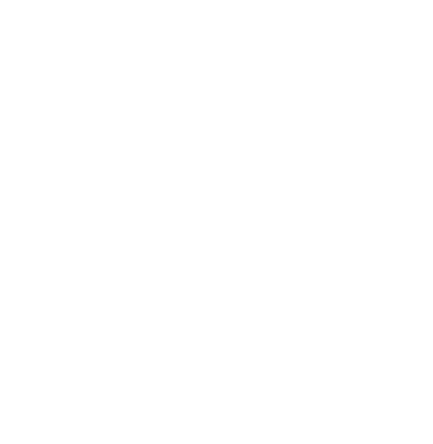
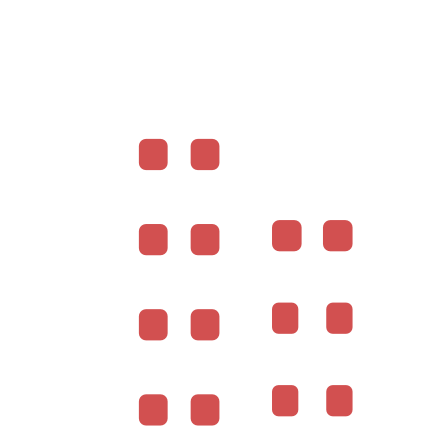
part: none -> (179, 154)
part: none -> (312, 235)
part: none -> (179, 239)
part: none -> (312, 318)
part: none -> (179, 324)
part: none -> (312, 400)
part: none -> (179, 409)

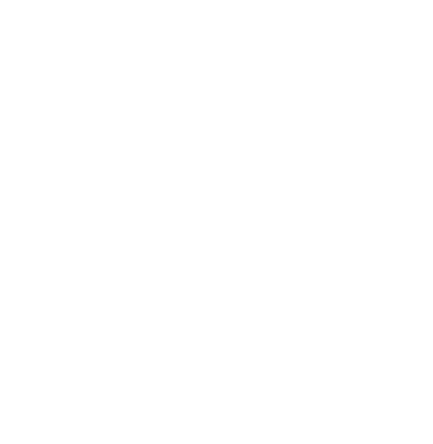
part: (179, 154) -> none
part: (312, 235) -> none
part: (179, 239) -> none
part: (312, 318) -> none
part: (179, 324) -> none
part: (312, 400) -> none
part: (179, 409) -> none

